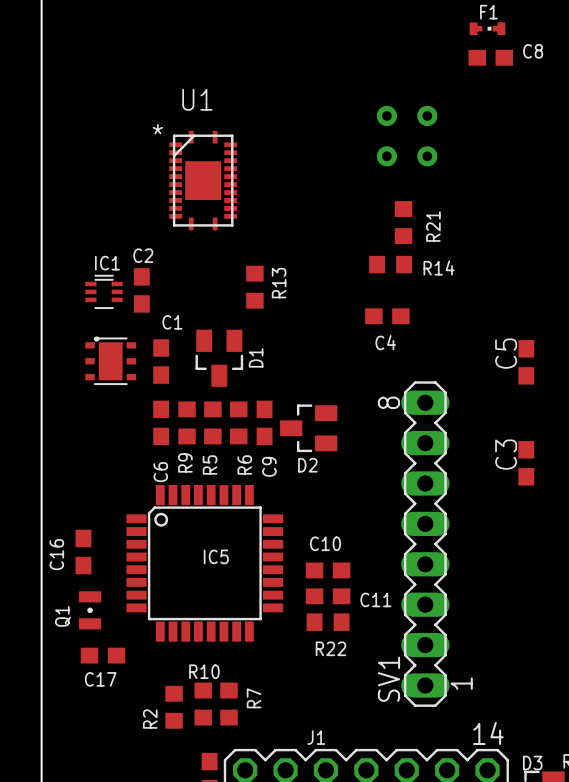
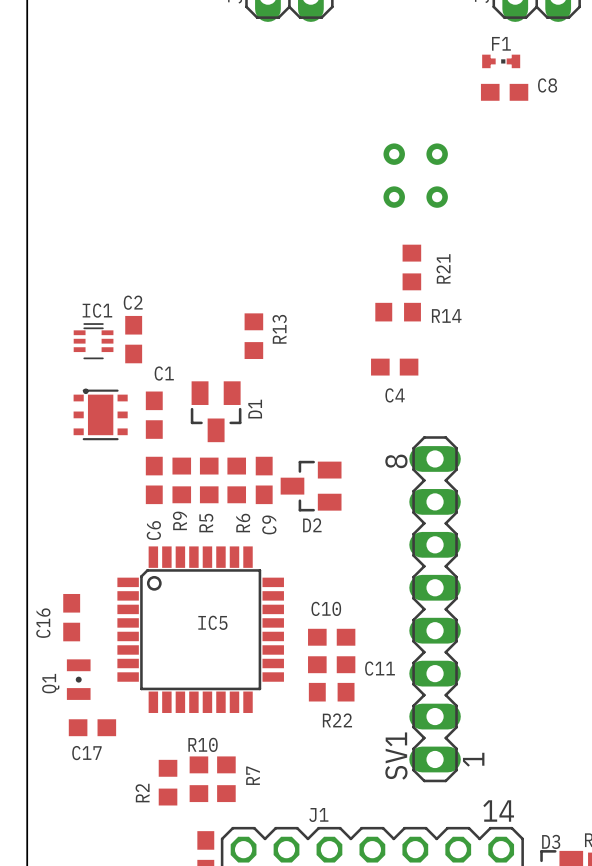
U1: (203, 180) -> none
C5: (526, 362) -> none
C3: (526, 463) -> none

